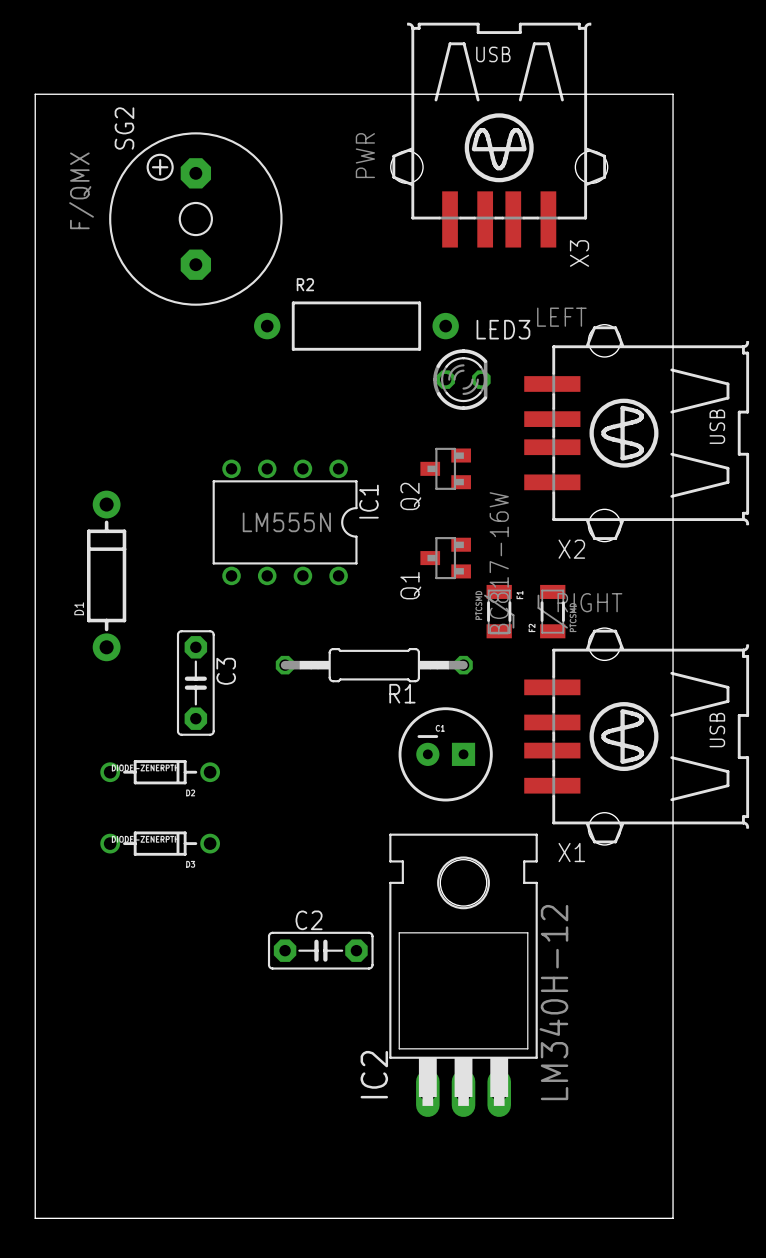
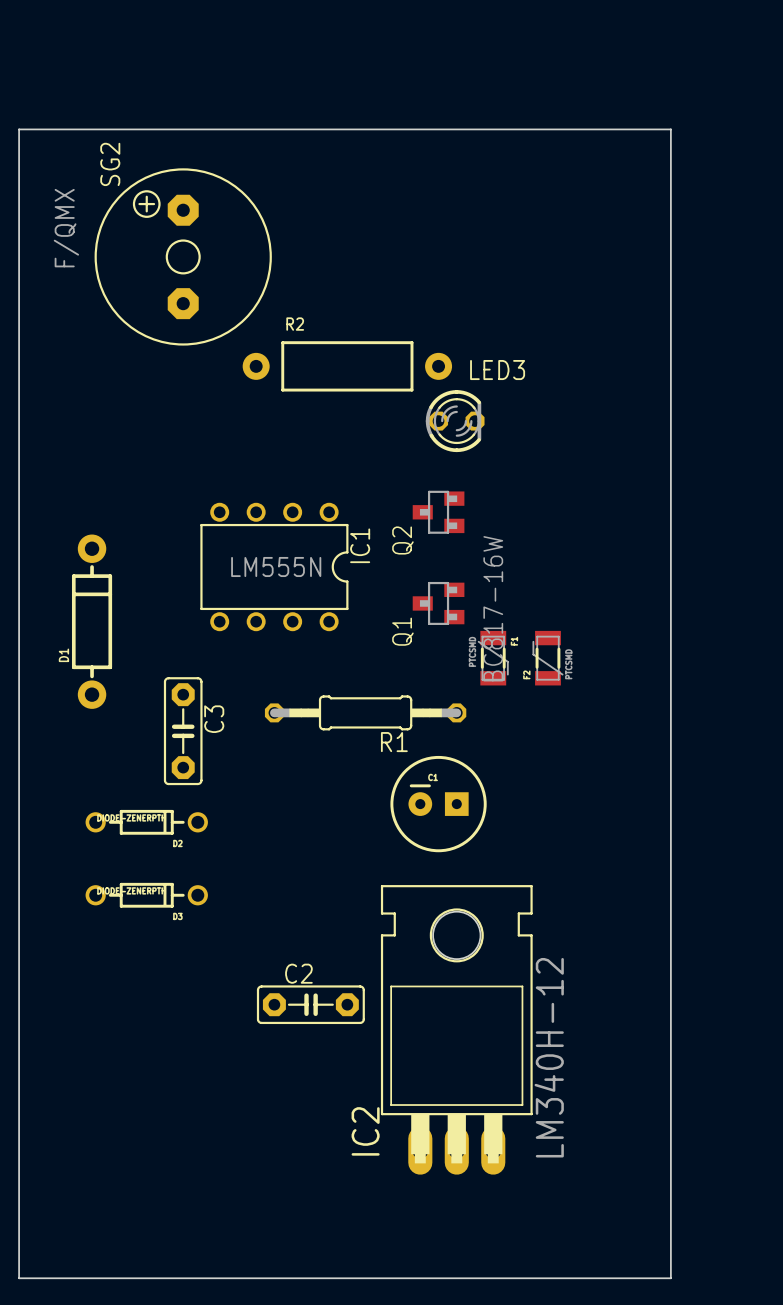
X3: PWR (499, 135) -> none
X2: LEFT (636, 433) -> none
X1: RIGHT (636, 736) -> none

